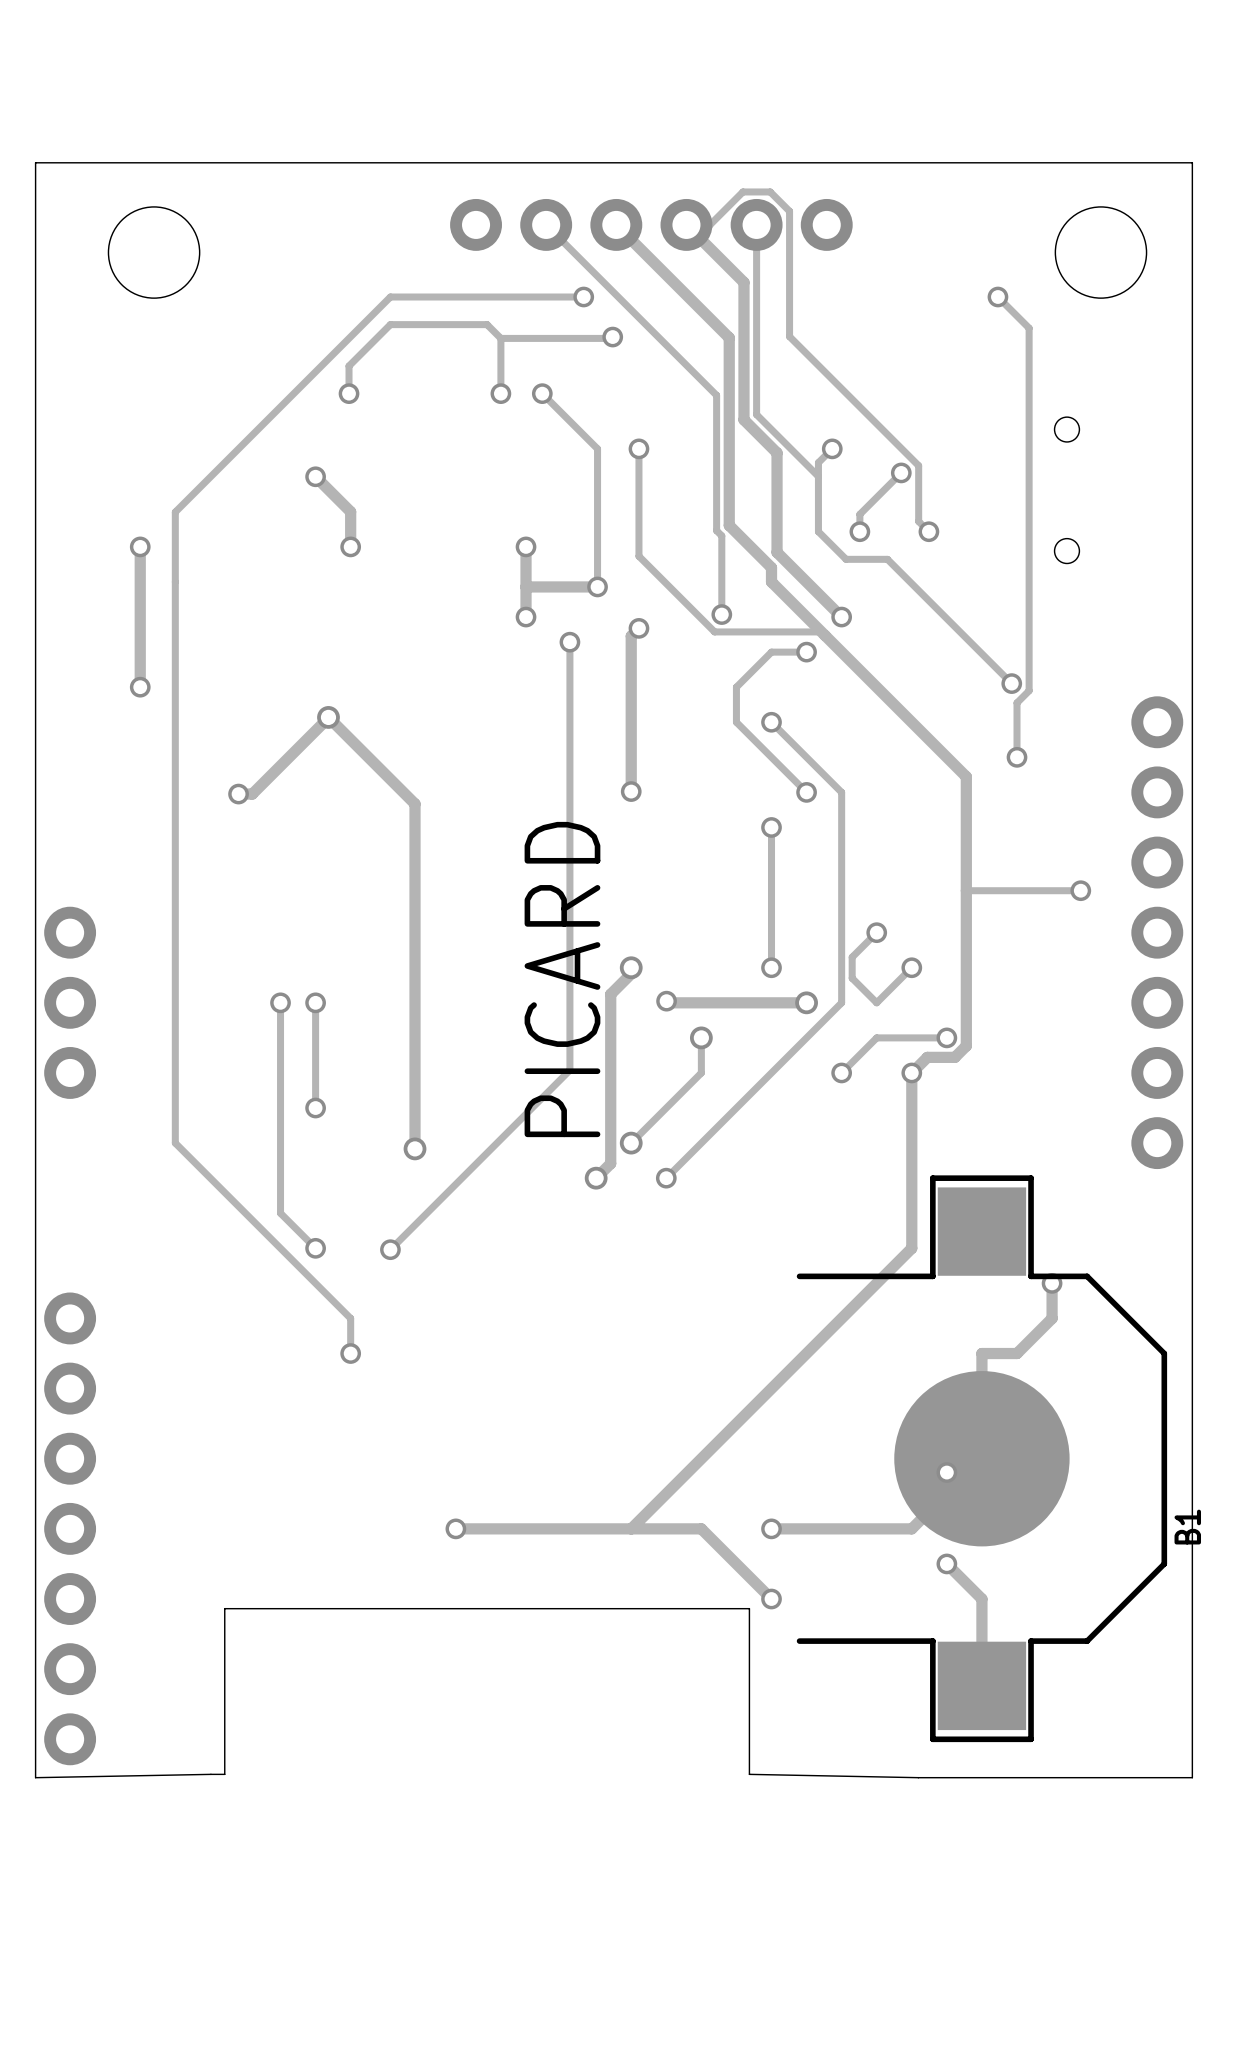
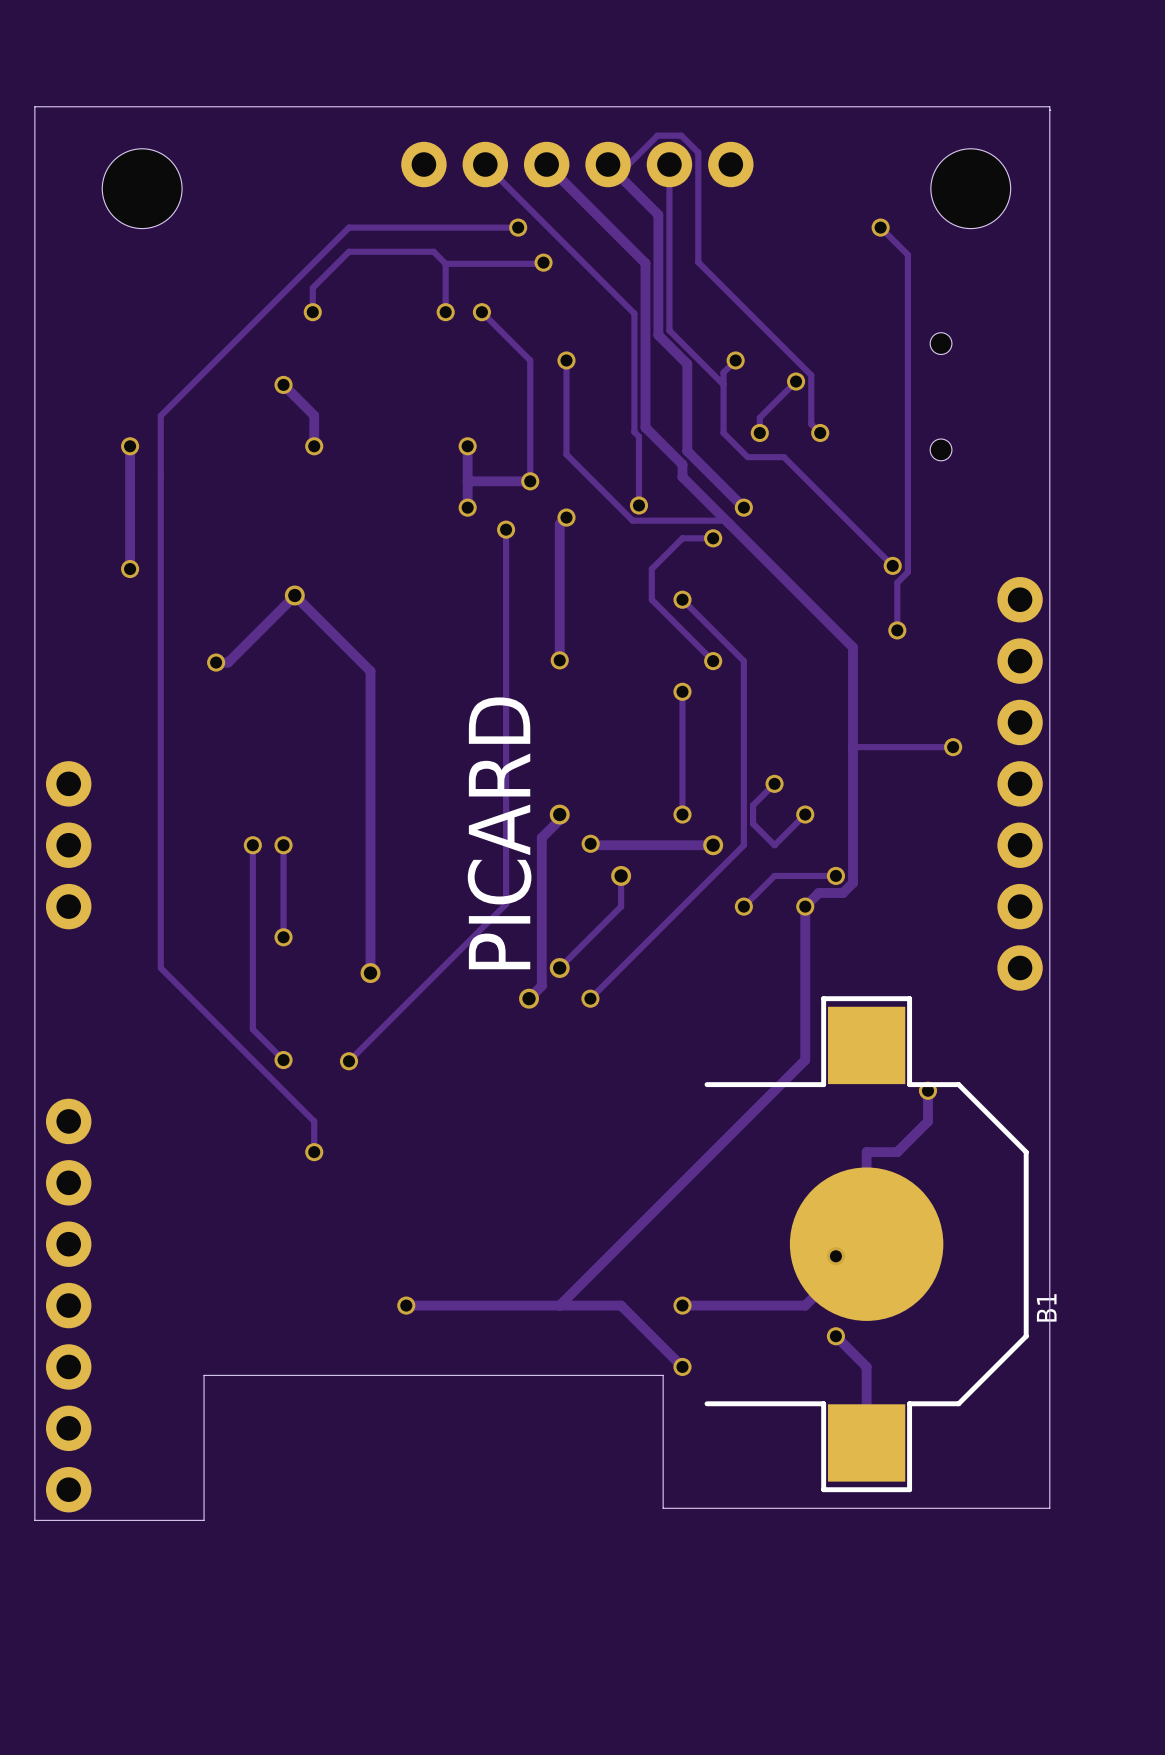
board edge: (1191, 162) (35, 162) (35, 1777) (210, 1774) -> (663, 1508) (1049, 1508) (1049, 106) (34, 106) (34, 1520) (191, 1520)
board edge: (1192, 162) (1192, 1777) (918, 1777) (749, 1774) (749, 1760) -> none

